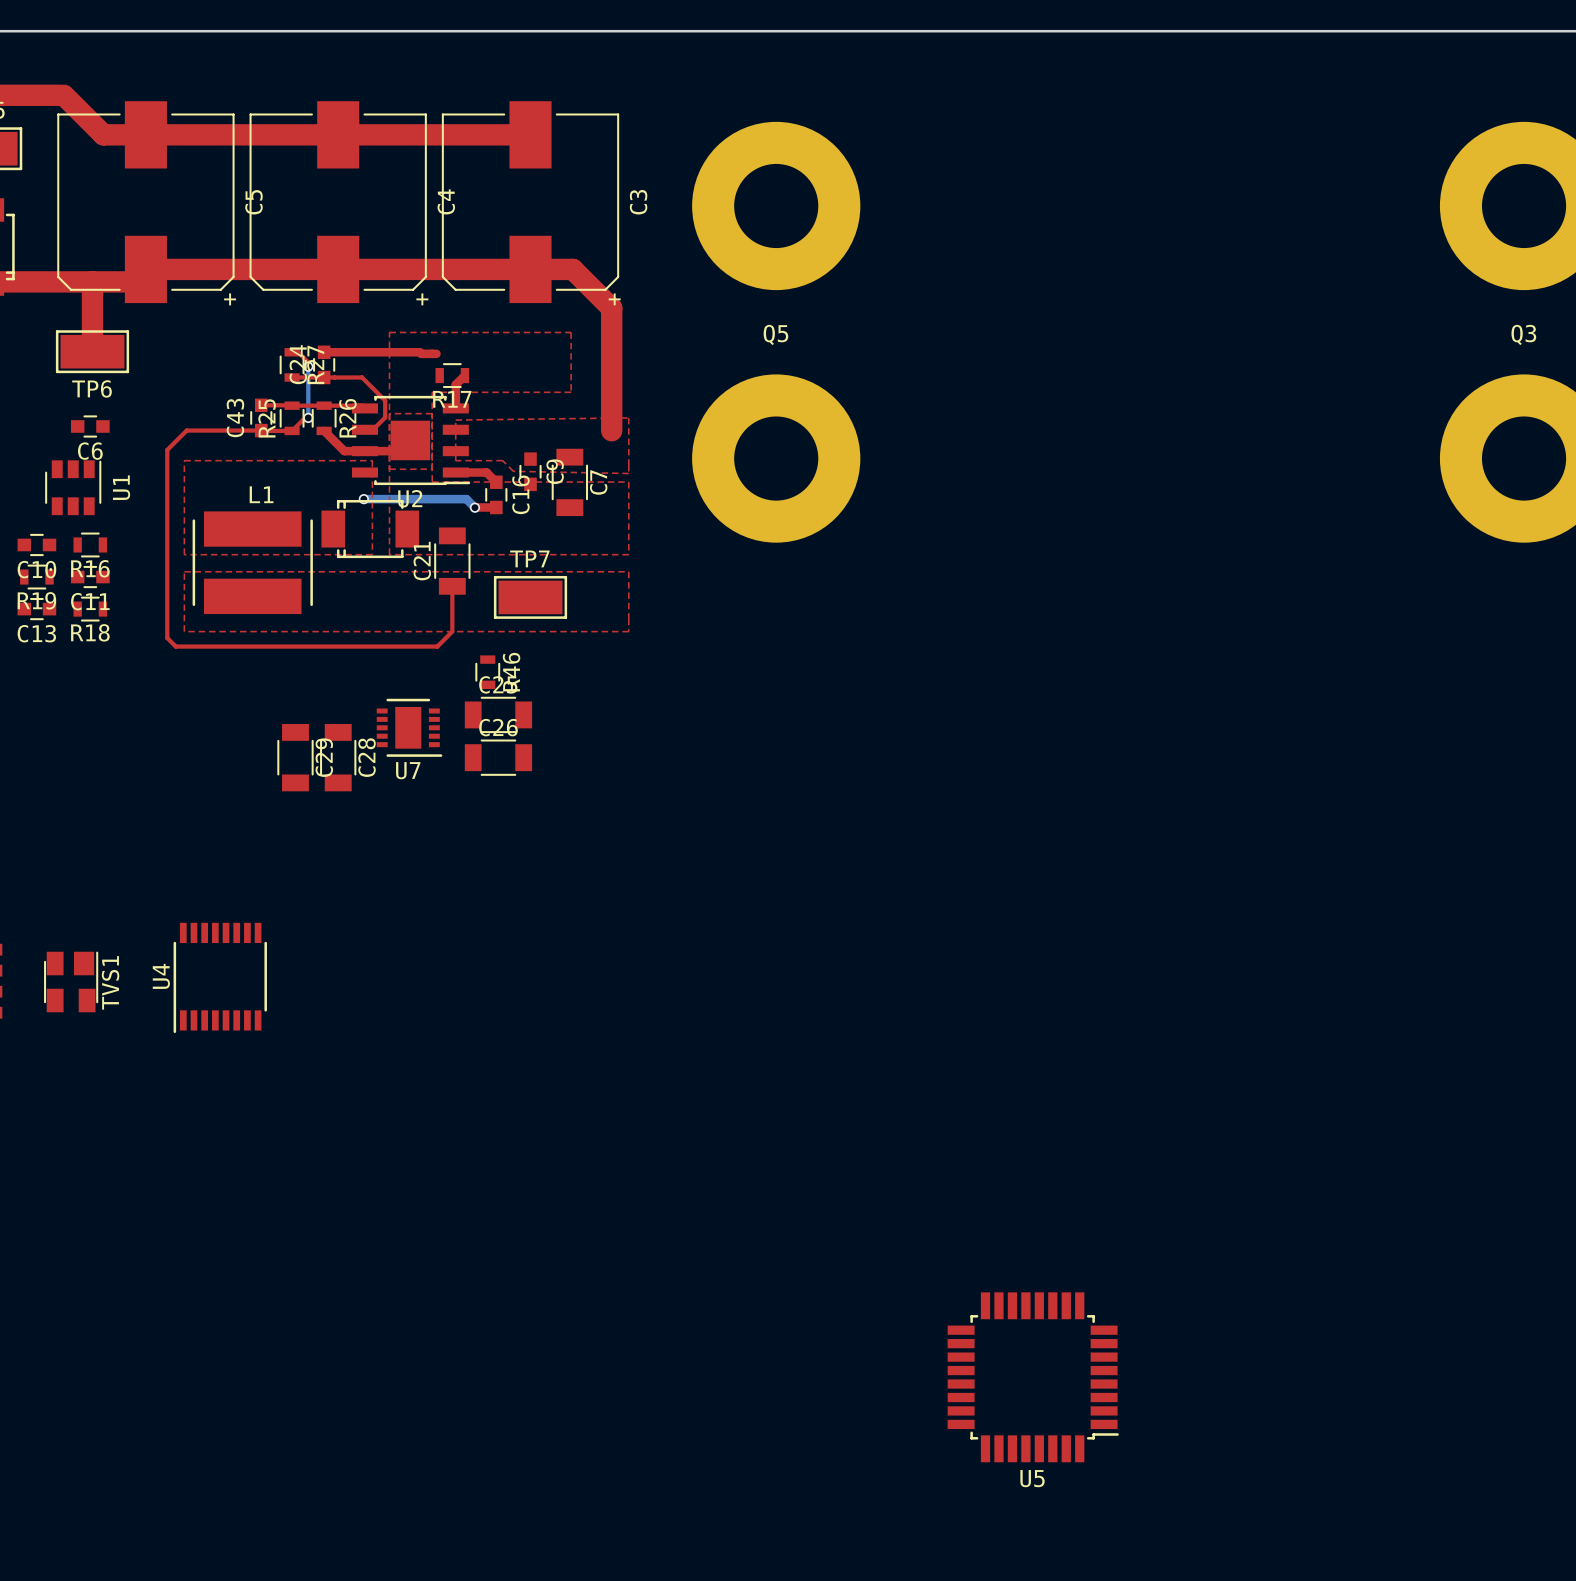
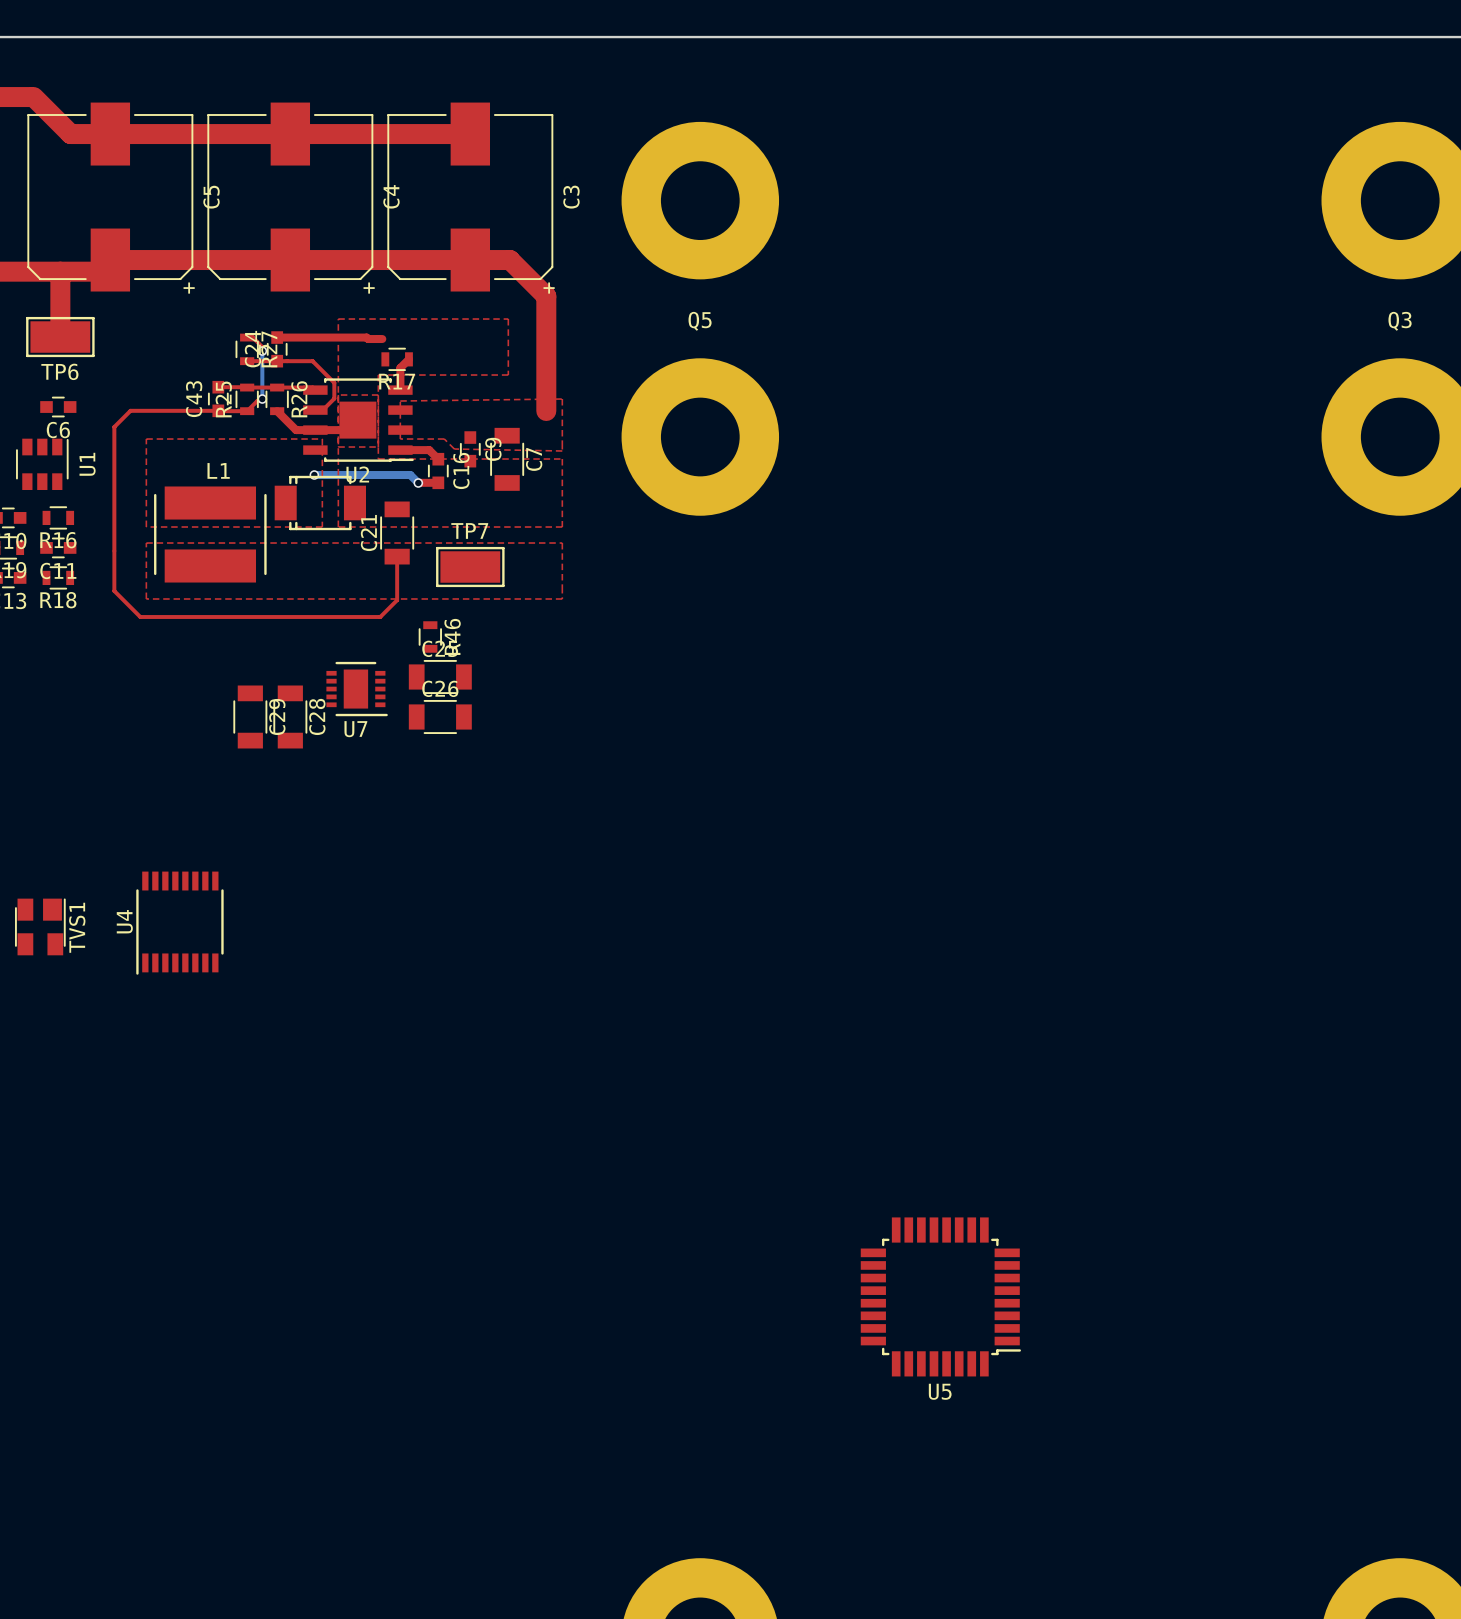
top track: (186, 430) (167, 449) (167, 638) (175, 646) (437, 646) (452, 631) -> (148, 410) (130, 410) (114, 427) (114, 591) (140, 617) (380, 617) (397, 599)

